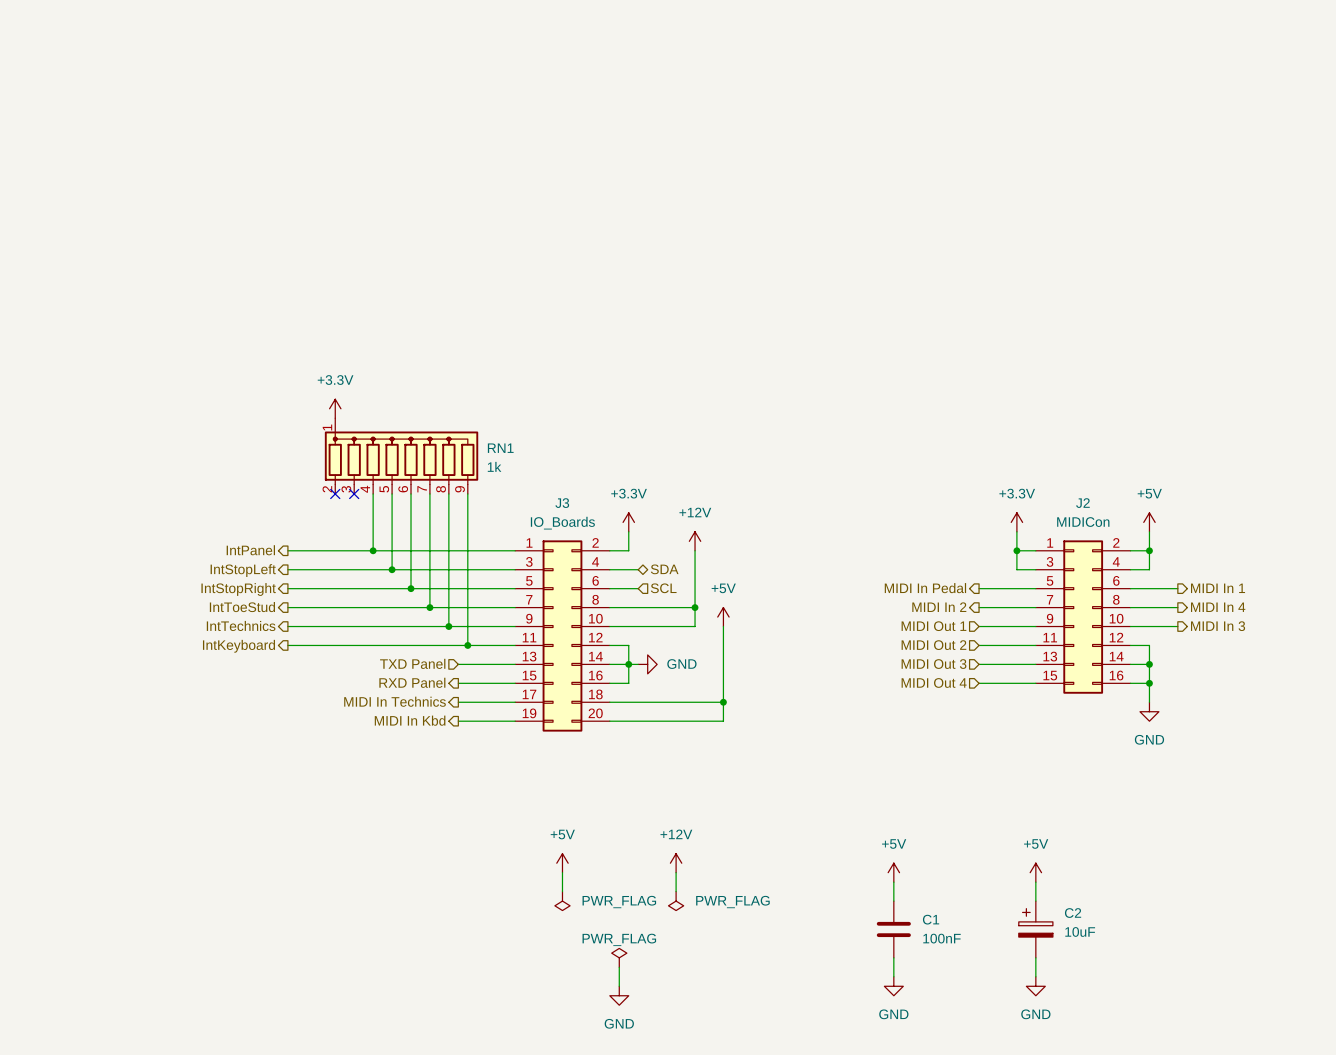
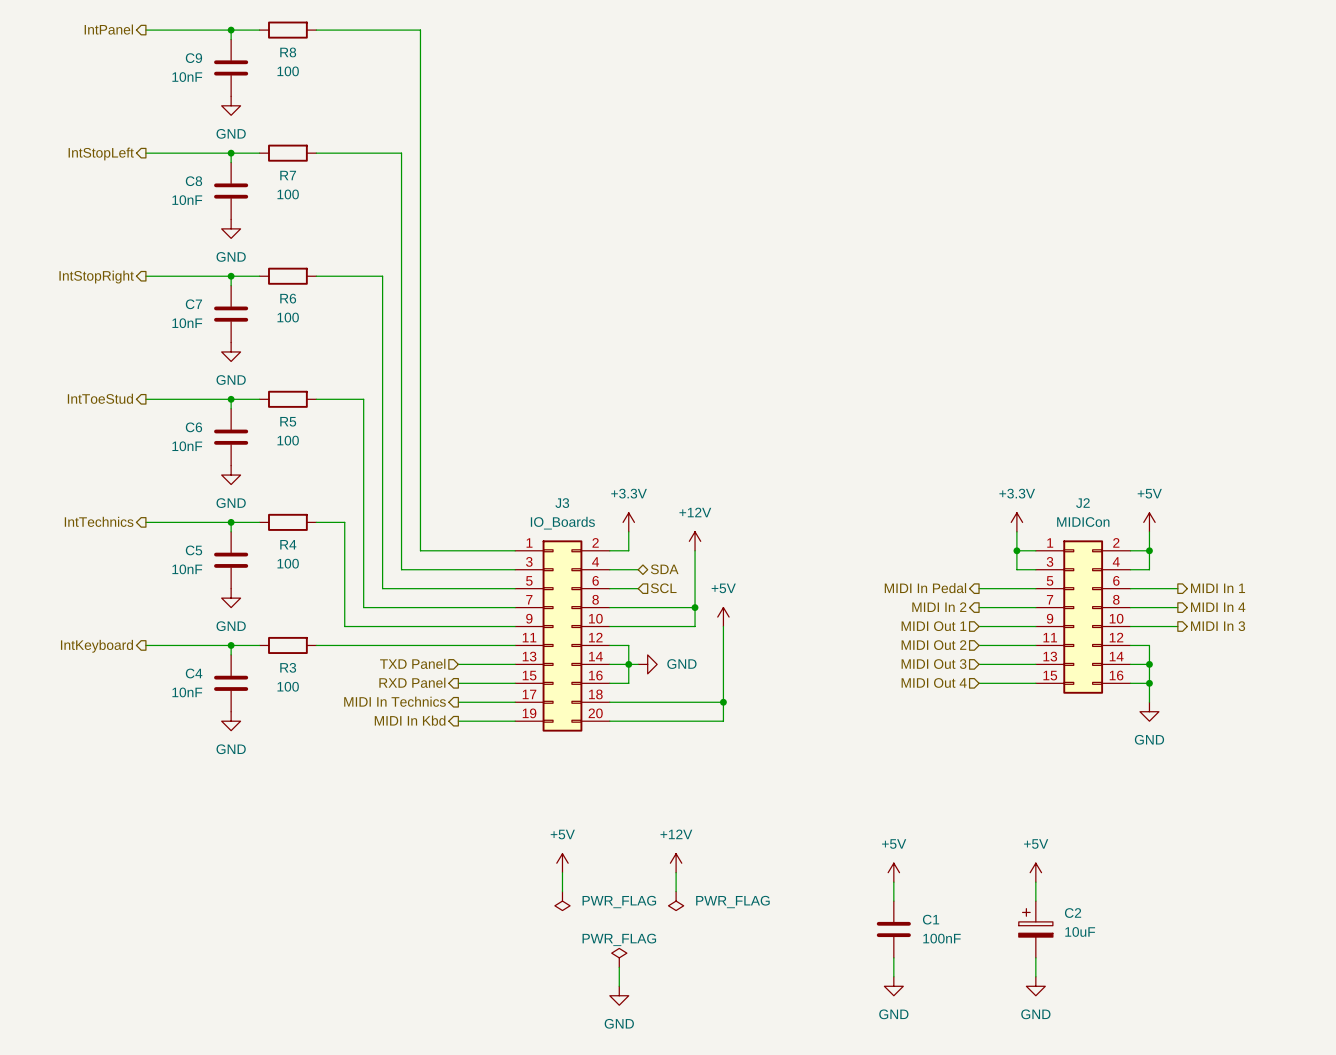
hierarchical label: none -> IntPanel (108, 29)
wire: none -> (145, 30) (259, 30)
wire: none -> (231, 30) (231, 39)
junction: none -> (231, 30)
R8: none -> 100 (287, 30)
C9: none -> 10nF (231, 67)
power symbol: none -> GND (231, 105)
hierarchical label: none -> IntStopLeft (101, 153)
wire: none -> (145, 153) (259, 153)
wire: none -> (231, 153) (231, 162)
junction: none -> (231, 153)
R7: none -> 100 (287, 153)
C8: none -> 10nF (231, 191)
power symbol: none -> GND (231, 228)
wire: none -> (145, 276) (259, 276)
wire: none -> (231, 276) (231, 285)
junction: none -> (231, 276)
R6: none -> 100 (287, 276)
hierarchical label: none -> IntStopRight (96, 277)
C7: none -> 10nF (231, 314)
power symbol: none -> GND (231, 351)
hierarchical label: none -> IntToeStud (100, 398)
wire: none -> (145, 399) (259, 399)
wire: none -> (231, 399) (231, 408)
junction: none -> (231, 399)
R5: none -> 100 (287, 399)
power symbol: +3.3V (335, 408) -> none
C6: none -> 10nF (231, 437)
RN1: 1k (401, 456) -> none
power symbol: none -> GND (231, 475)
no-connect mark: (335, 493) -> none
no-connect mark: (354, 493) -> none
wire: (373, 493) (373, 550) -> none
wire: (392, 493) (392, 569) -> none
wire: (411, 493) (411, 588) -> none
wire: (429, 493) (429, 607) -> none
wire: (448, 493) (448, 626) -> none
wire: (467, 493) (467, 645) -> none
wire: none -> (145, 522) (259, 522)
wire: none -> (231, 522) (231, 531)
junction: none -> (231, 522)
R4: none -> 100 (287, 522)
hierarchical label: IntPanel (250, 550) -> none
wire: (287, 550) (420, 550) -> (316, 30) (420, 30) (420, 550)
junction: (373, 550) -> none
C5: none -> 10nF (231, 560)
wire: (287, 569) (401, 569) -> (316, 153) (401, 153) (401, 569)
junction: (392, 569) -> none
hierarchical label: IntStopLeft (243, 570) -> none
wire: (287, 588) (382, 588) -> (316, 276) (382, 276) (382, 588)
junction: (411, 588) -> none
hierarchical label: IntStopRight (238, 589) -> none
power symbol: none -> GND (231, 598)
hierarchical label: IntToeStud (242, 607) -> none
wire: (287, 607) (363, 607) -> (316, 399) (363, 399) (363, 607)
junction: (429, 607) -> none
hierarchical label position: IntTechnics (241, 625) -> IntTechnics (99, 521)
wire: (287, 626) (344, 626) -> (316, 522) (344, 522) (344, 626)
junction: (448, 626) -> none
wire: none -> (145, 645) (259, 645)
wire: none -> (231, 645) (231, 654)
junction: none -> (231, 645)
wire: (287, 645) (316, 645) -> none
R3: none -> 100 (287, 645)
junction: (467, 645) -> none
hierarchical label position: IntKeyboard (238, 646) -> IntKeyboard (96, 646)
C4: none -> 10nF (231, 683)
power symbol: none -> GND (231, 721)

